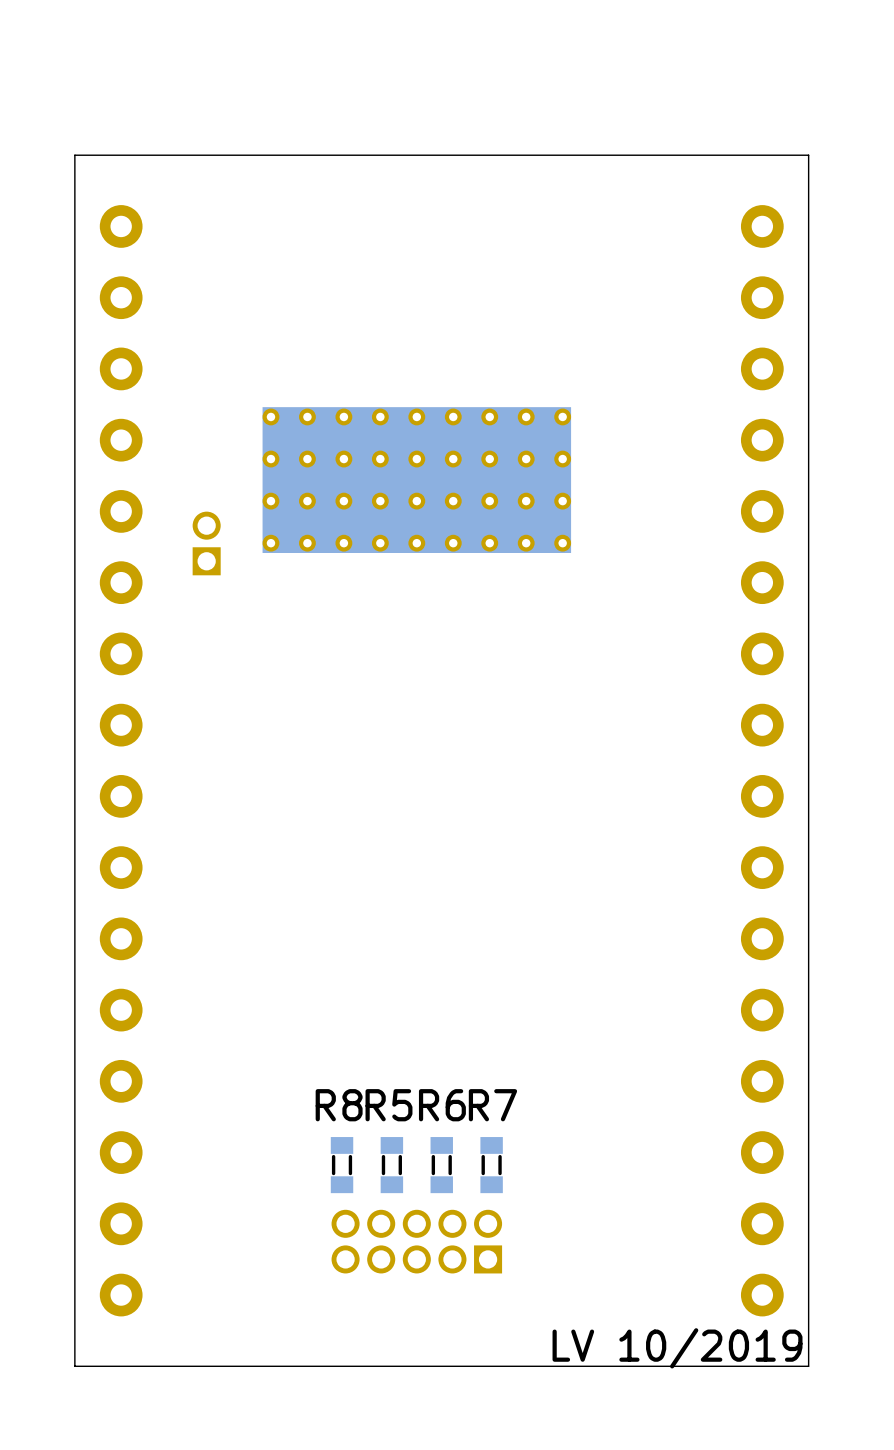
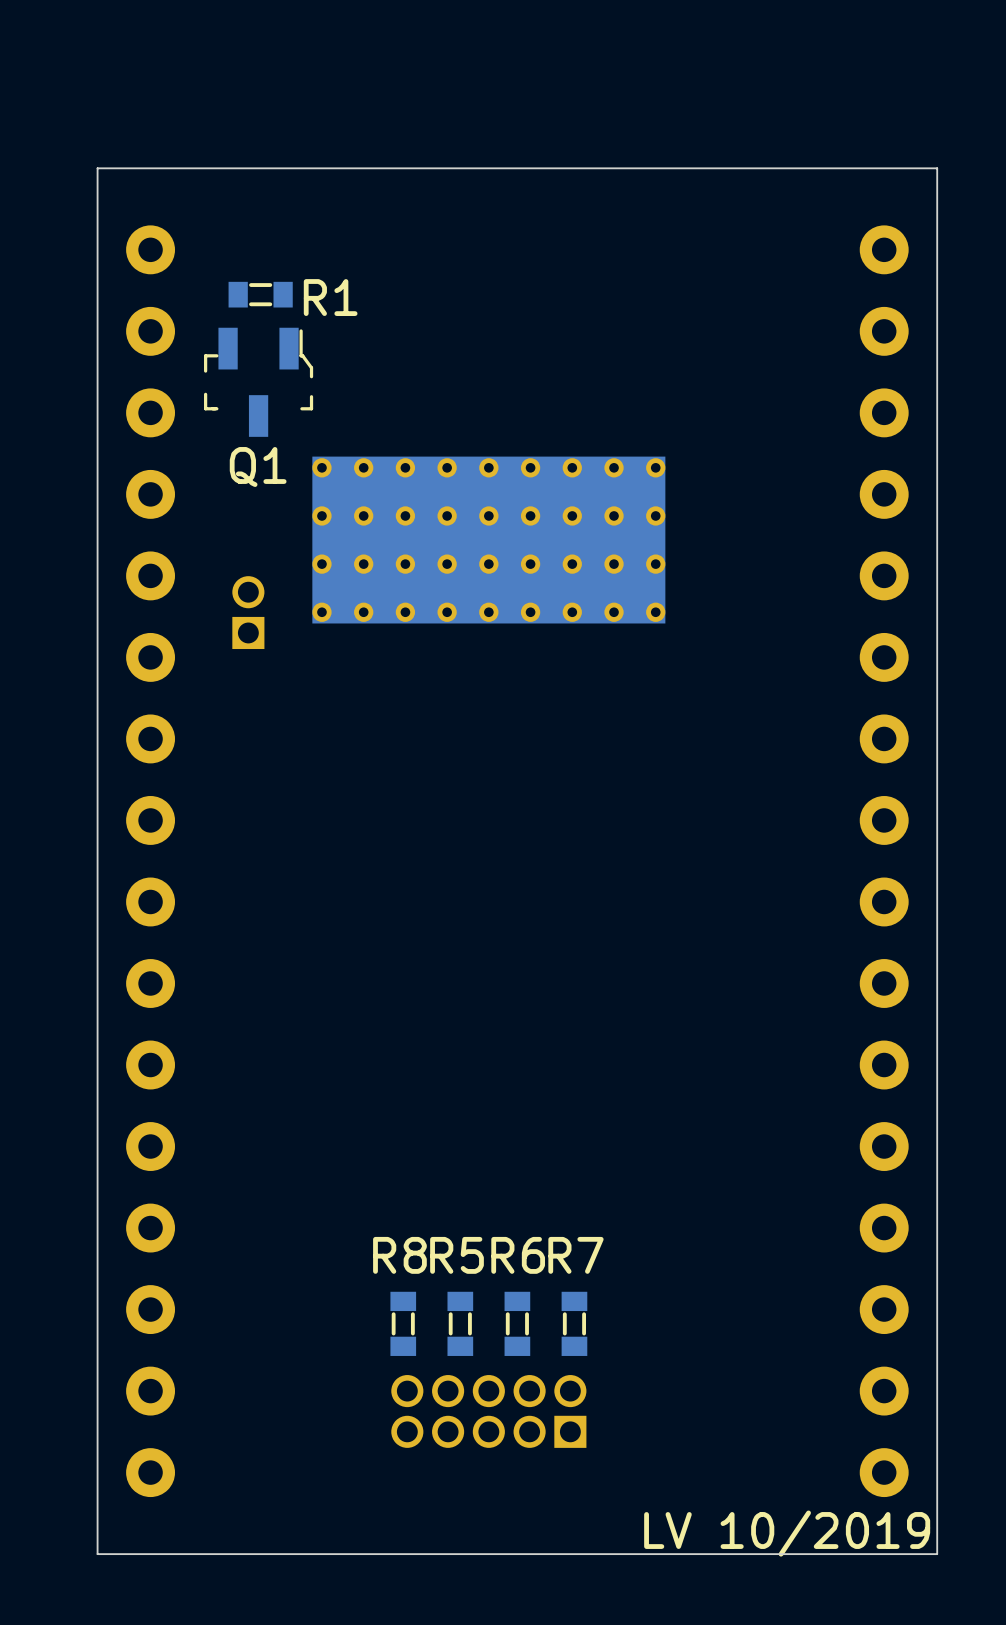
R1: none -> (260, 294)
Q1: none -> (258, 382)

